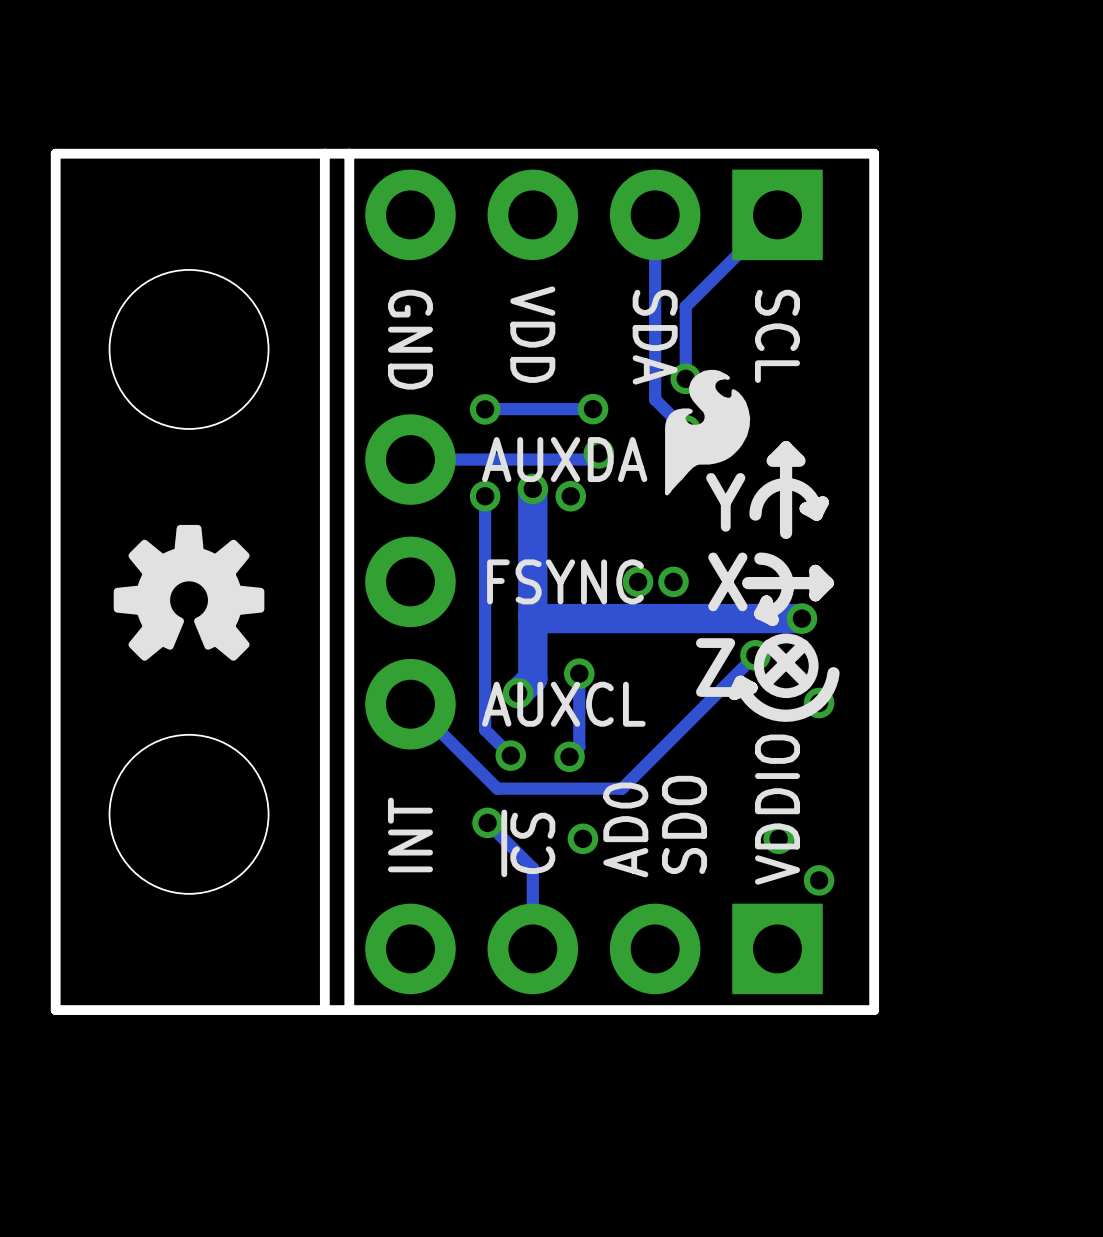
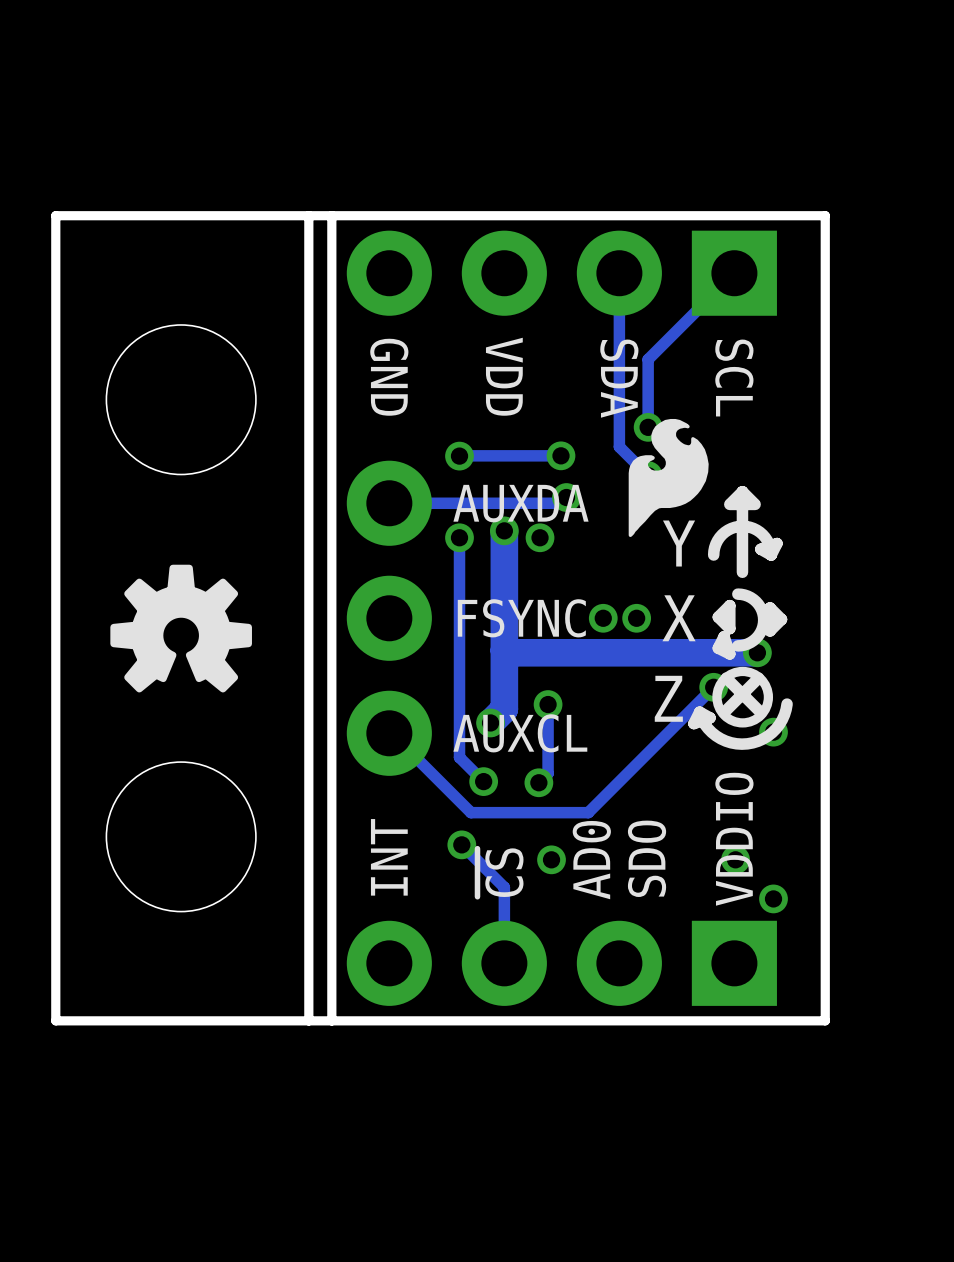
line: (760, 558) (770, 560) (779, 566) (785, 575) (787, 586) (785, 596) (779, 605) (770, 611) (760, 613) -> (737, 594) (747, 596) (756, 601) (761, 610) (763, 620) (761, 629) (756, 638) (747, 643) (737, 645)
line: none -> (729, 605) (718, 617) (729, 628) (729, 605)
line: (827, 583) (748, 583) -> none

